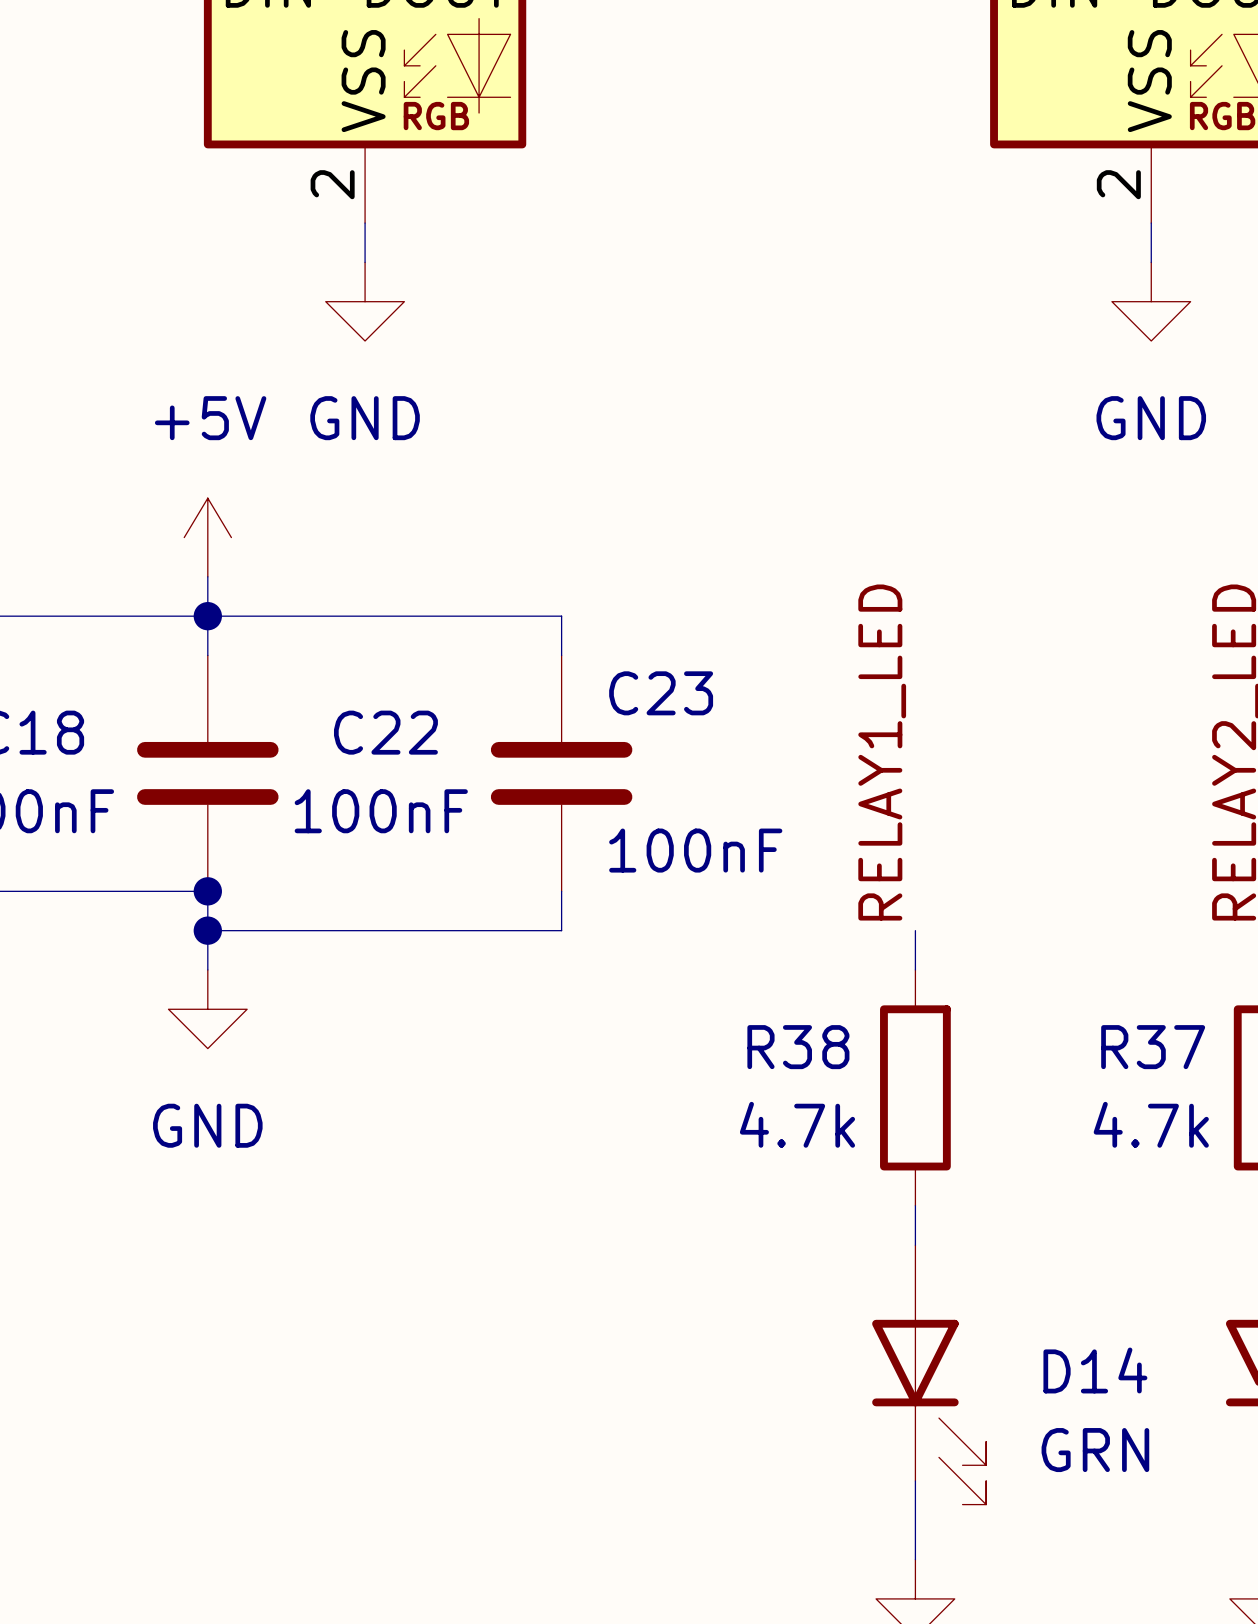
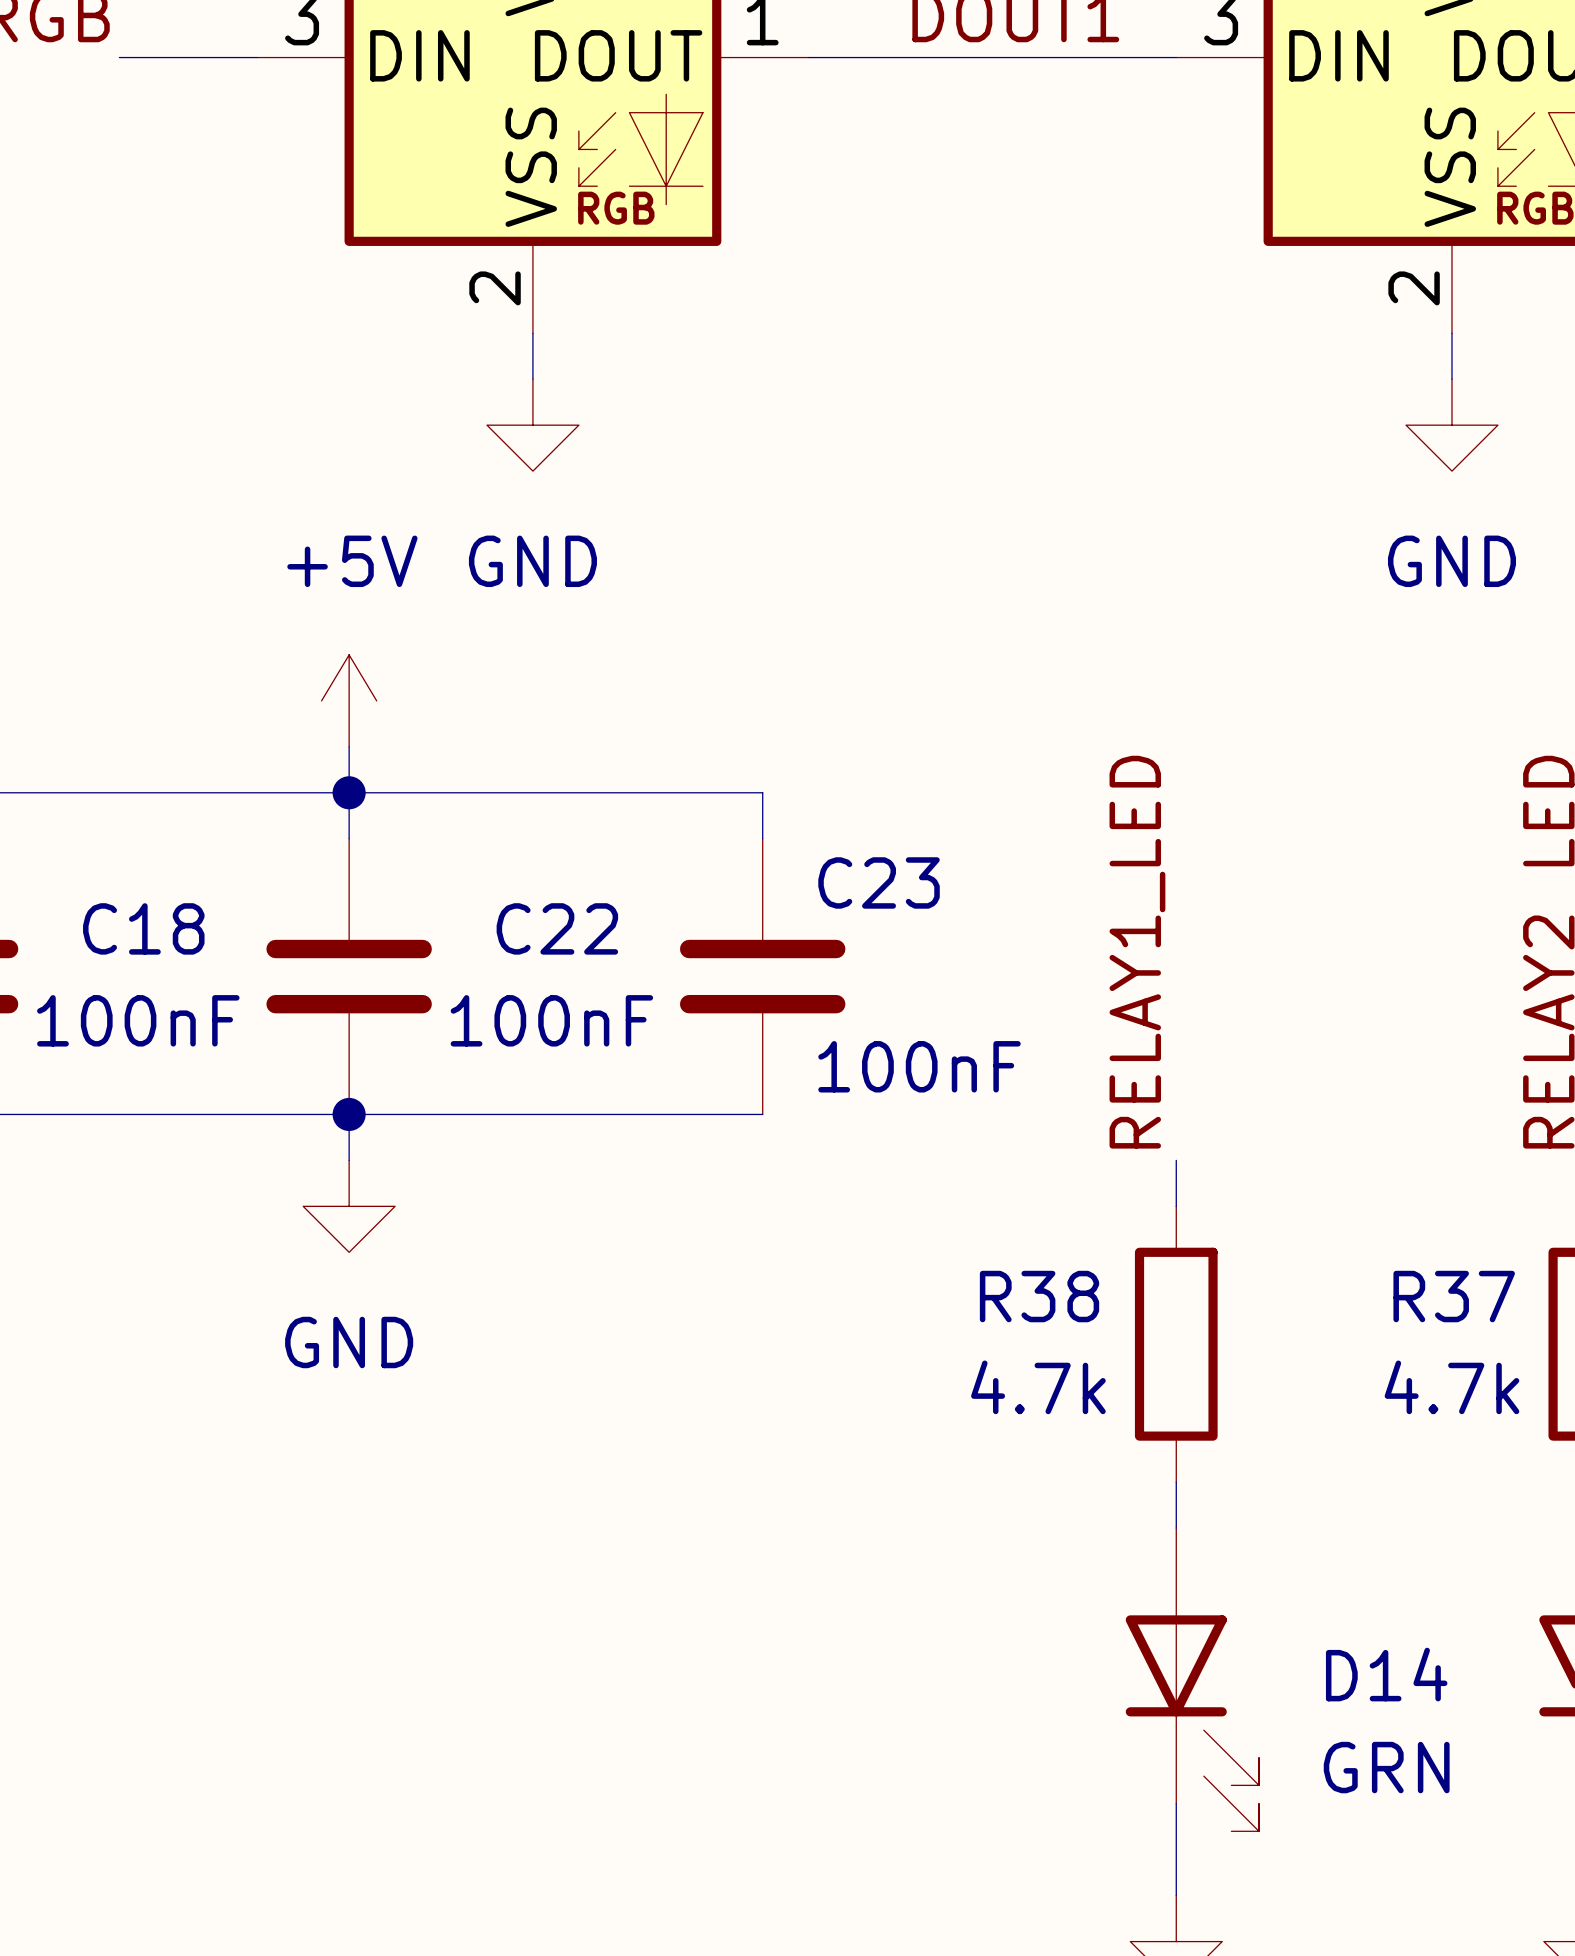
wire: (561, 891) (561, 930) (207, 930) (207, 969) -> (762, 1114) (349, 1114)
junction: (207, 930) -> none
power symbol position: GND (207, 1009) -> GND (349, 1206)

